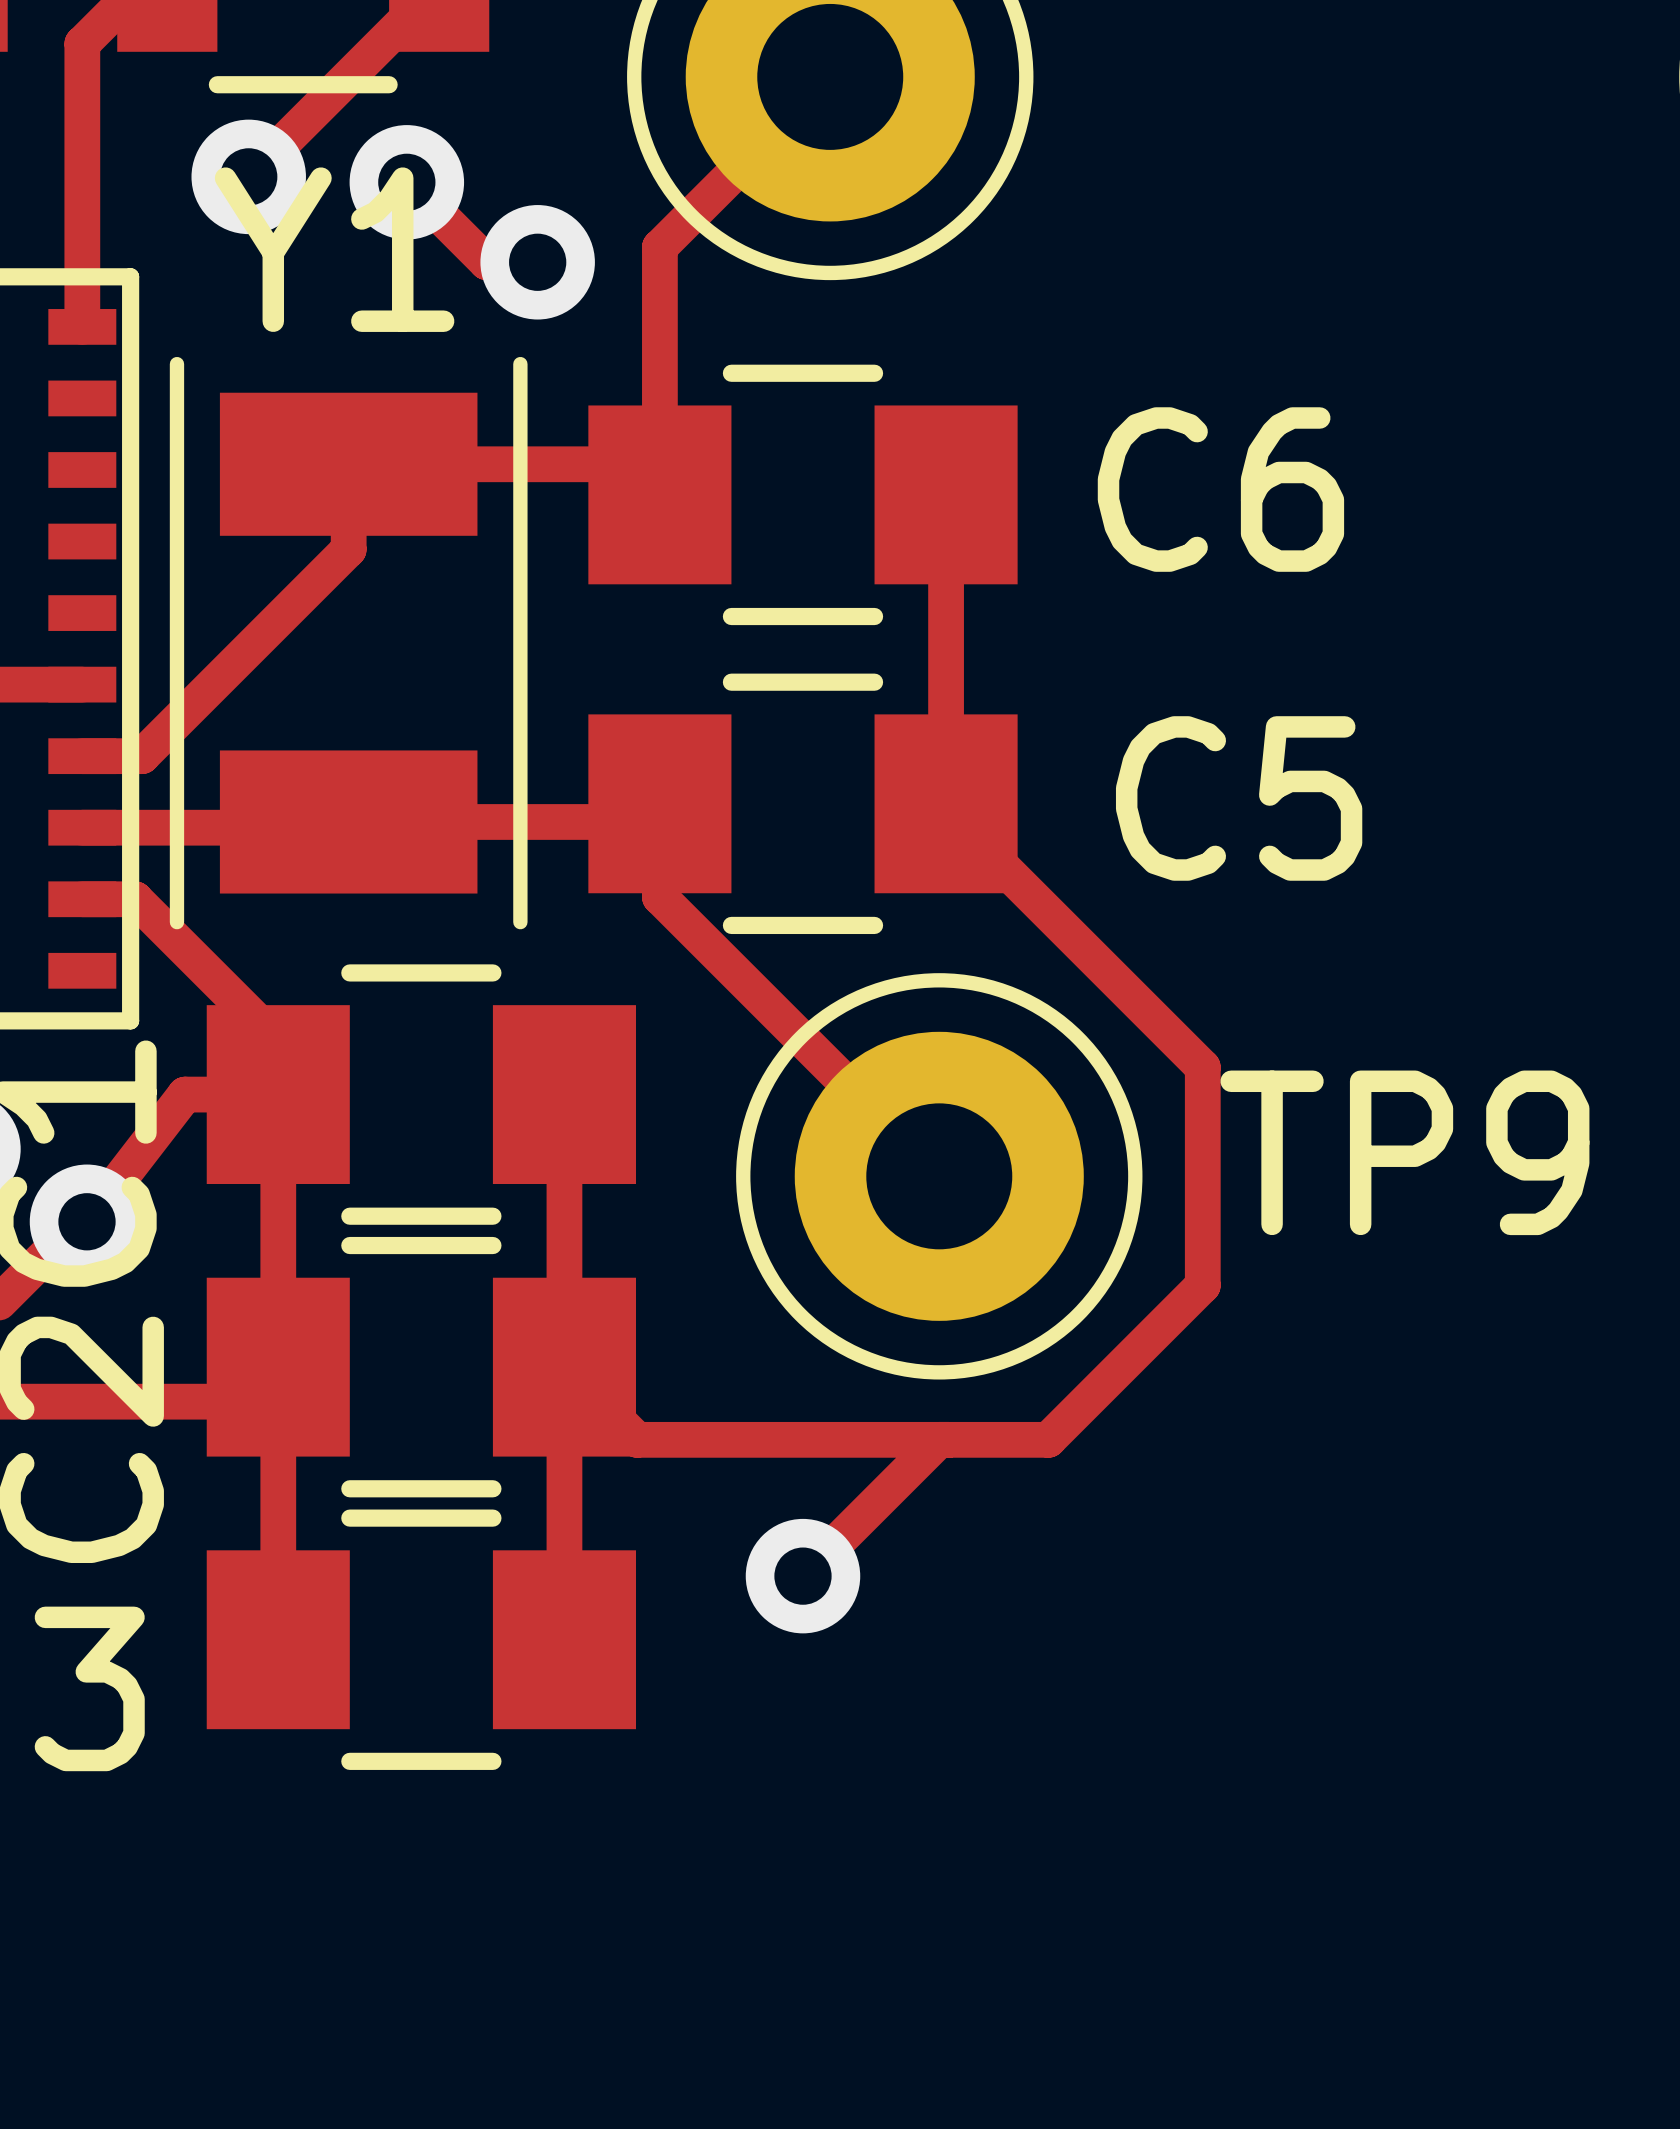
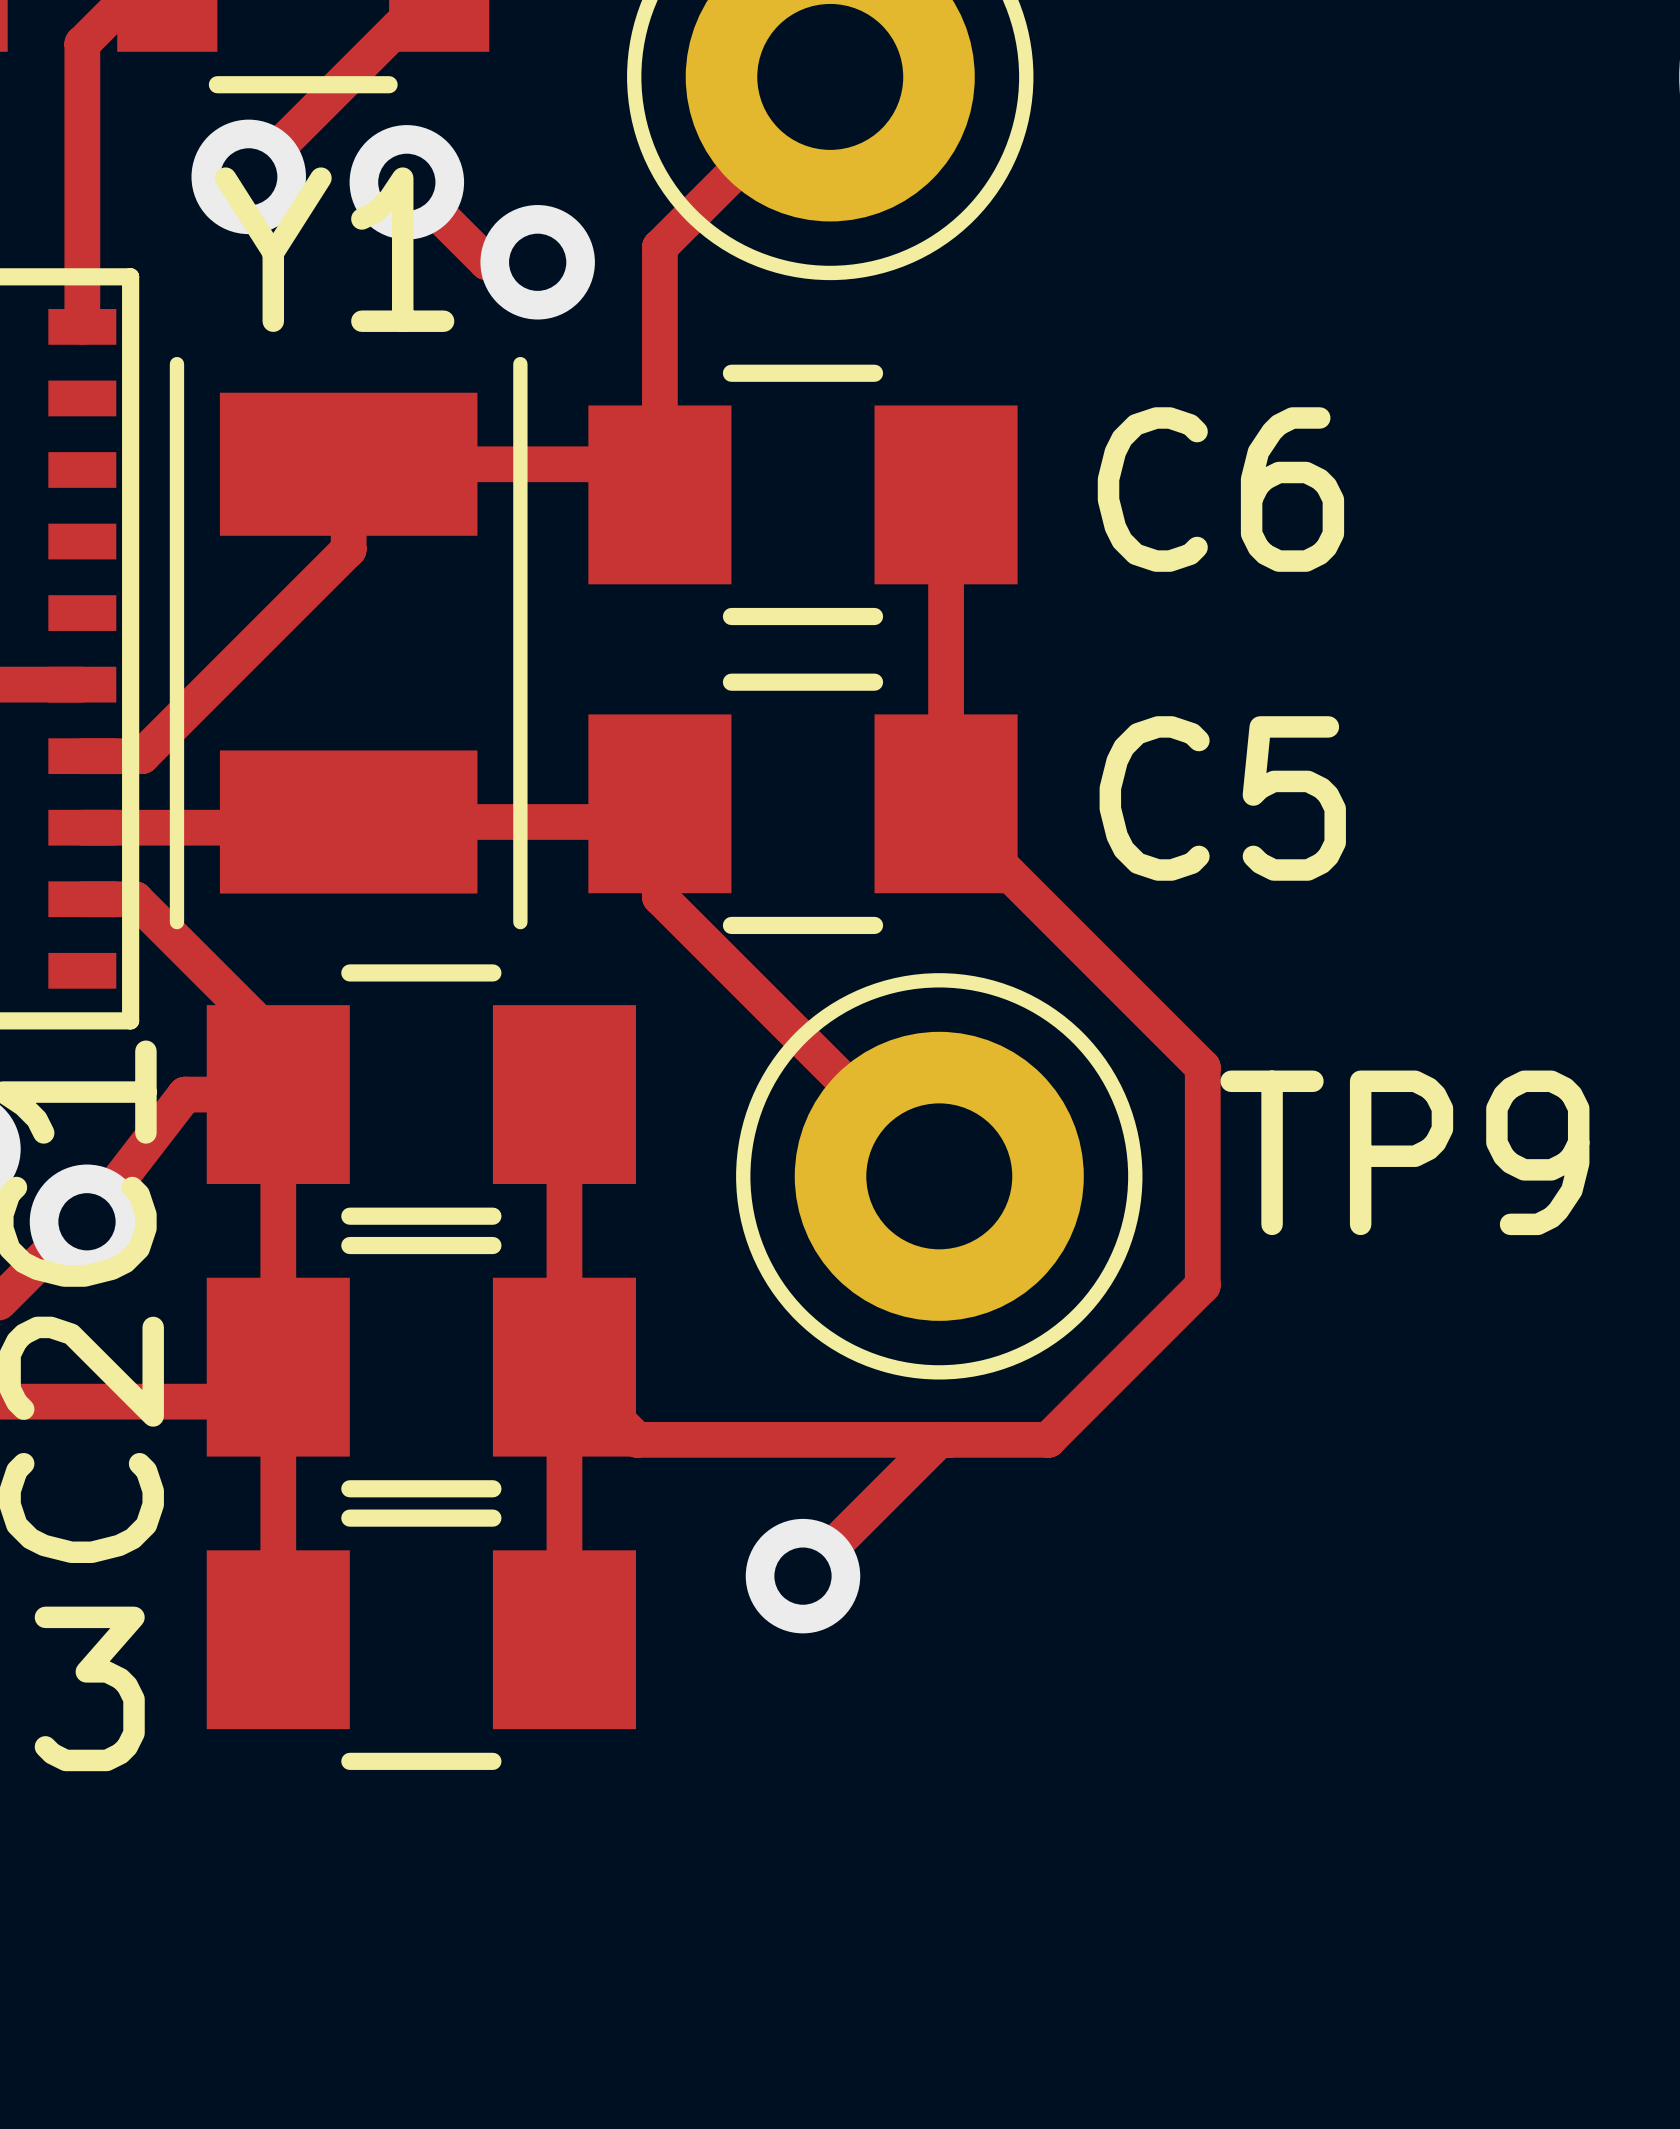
C5 name position: C5 (1239, 798) -> C5 (1222, 798)

